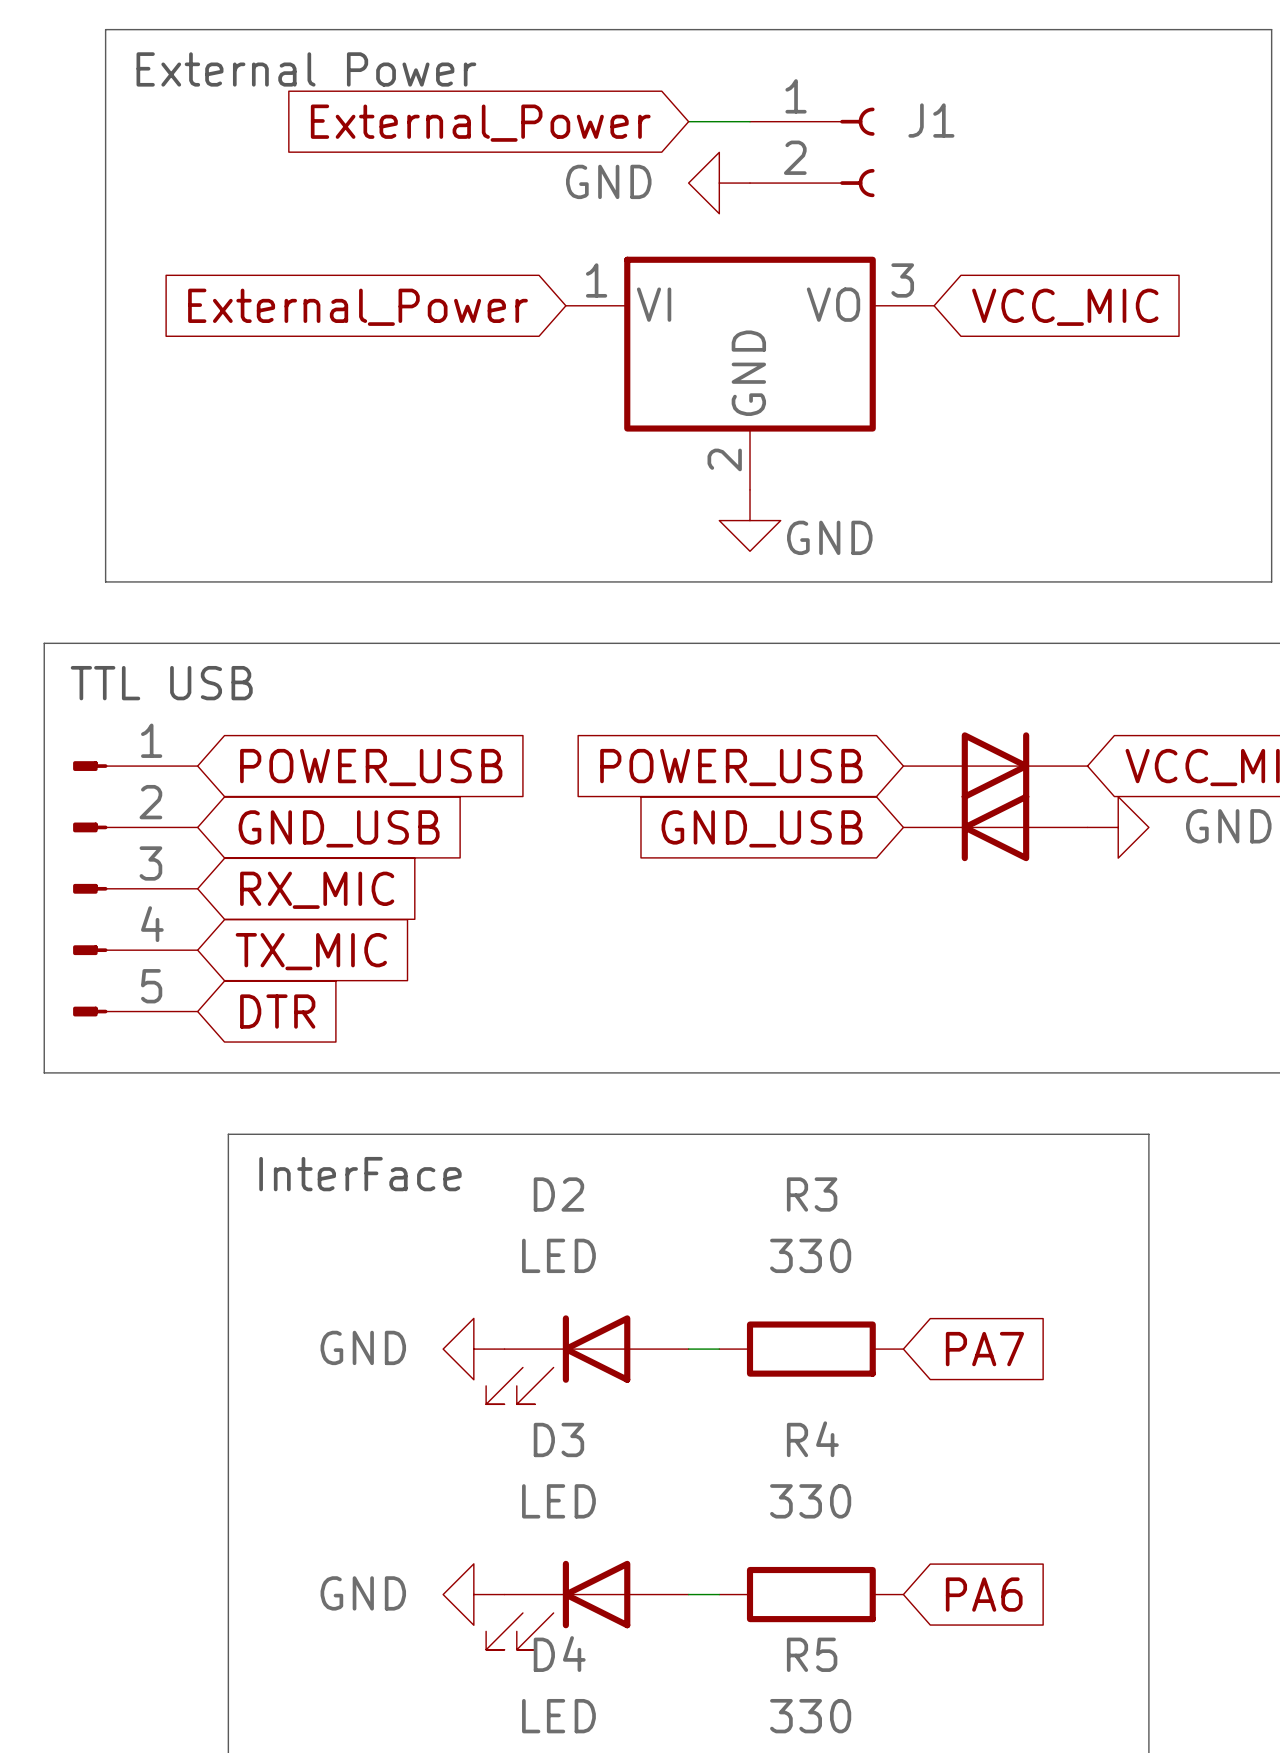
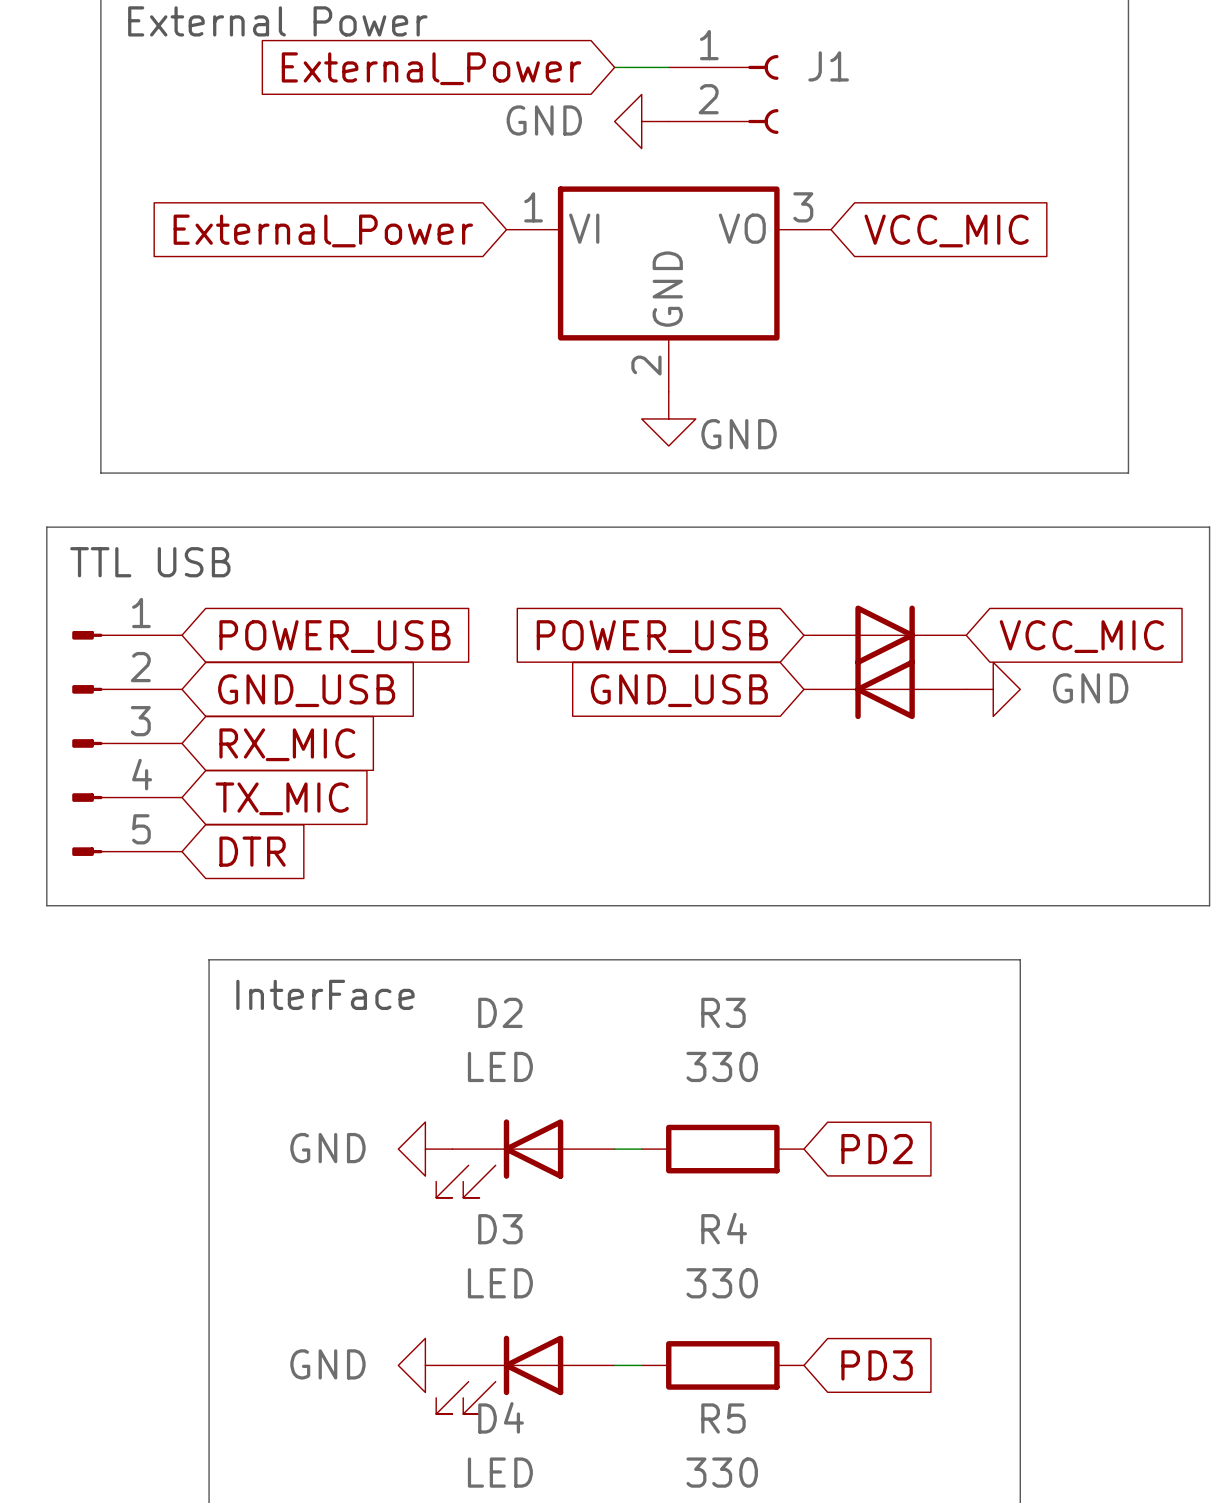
global label: PA7 (984, 1349) -> PD2 (877, 1149)
global label: PA6 (984, 1594) -> PD3 (877, 1365)

